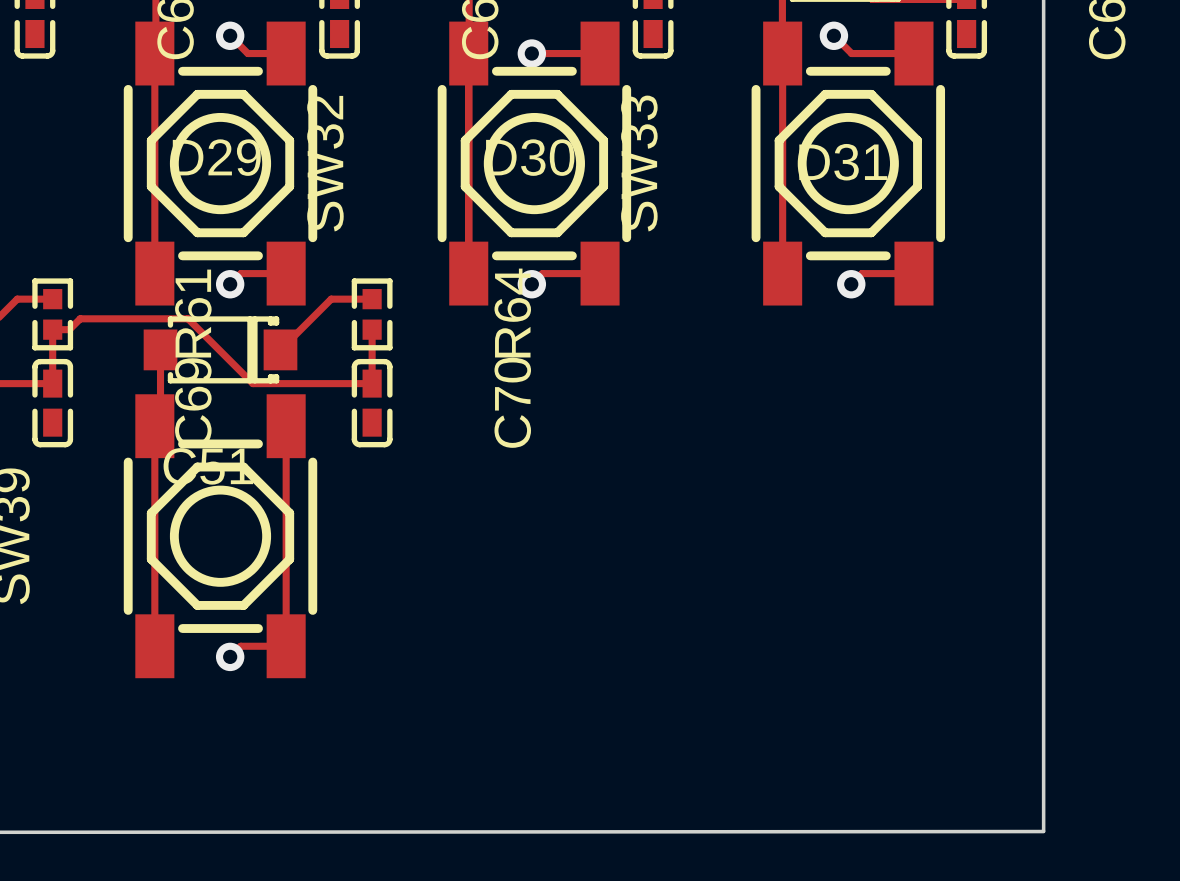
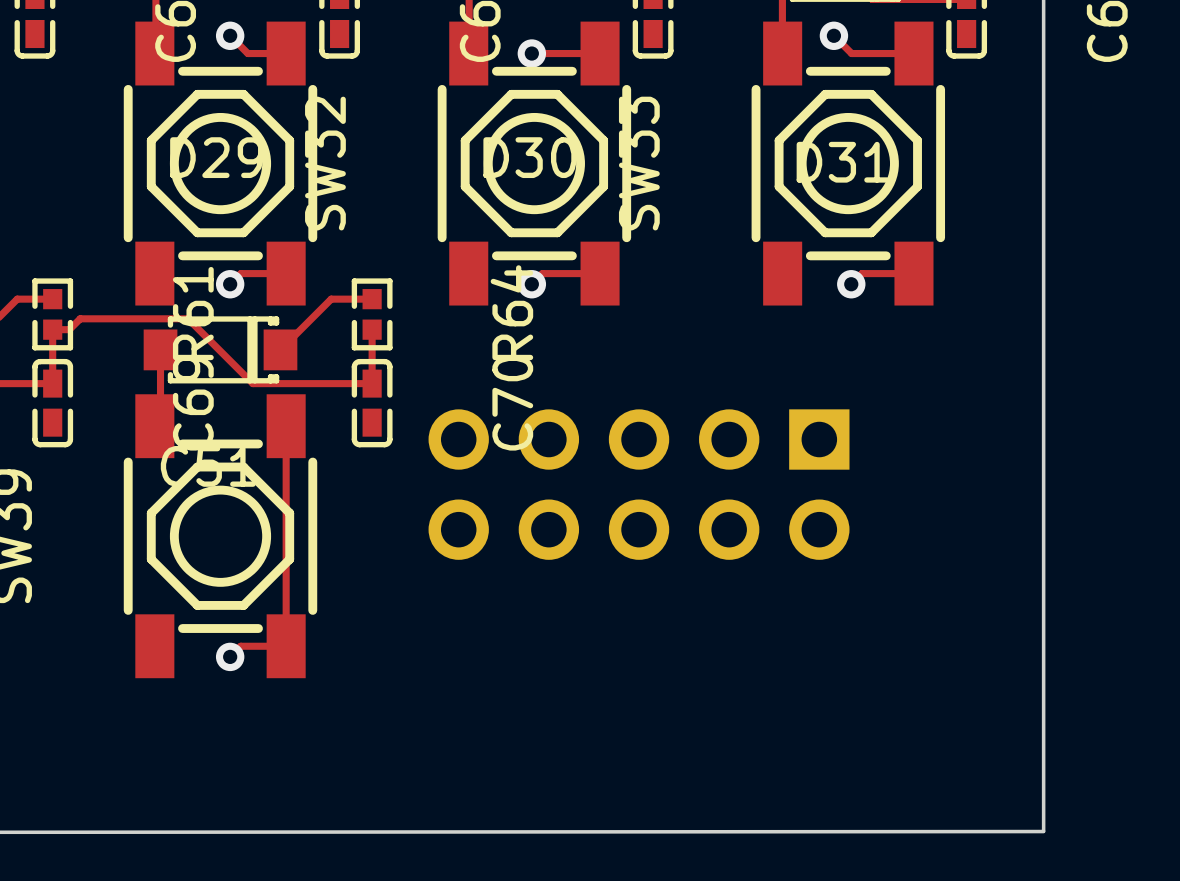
track: (154, 53) (154, 273) -> none
track: (468, 53) (468, 273) -> none
track: (782, 53) (782, 273) -> none
track: (154, 426) (154, 646) -> none
part: none -> (639, 484)

